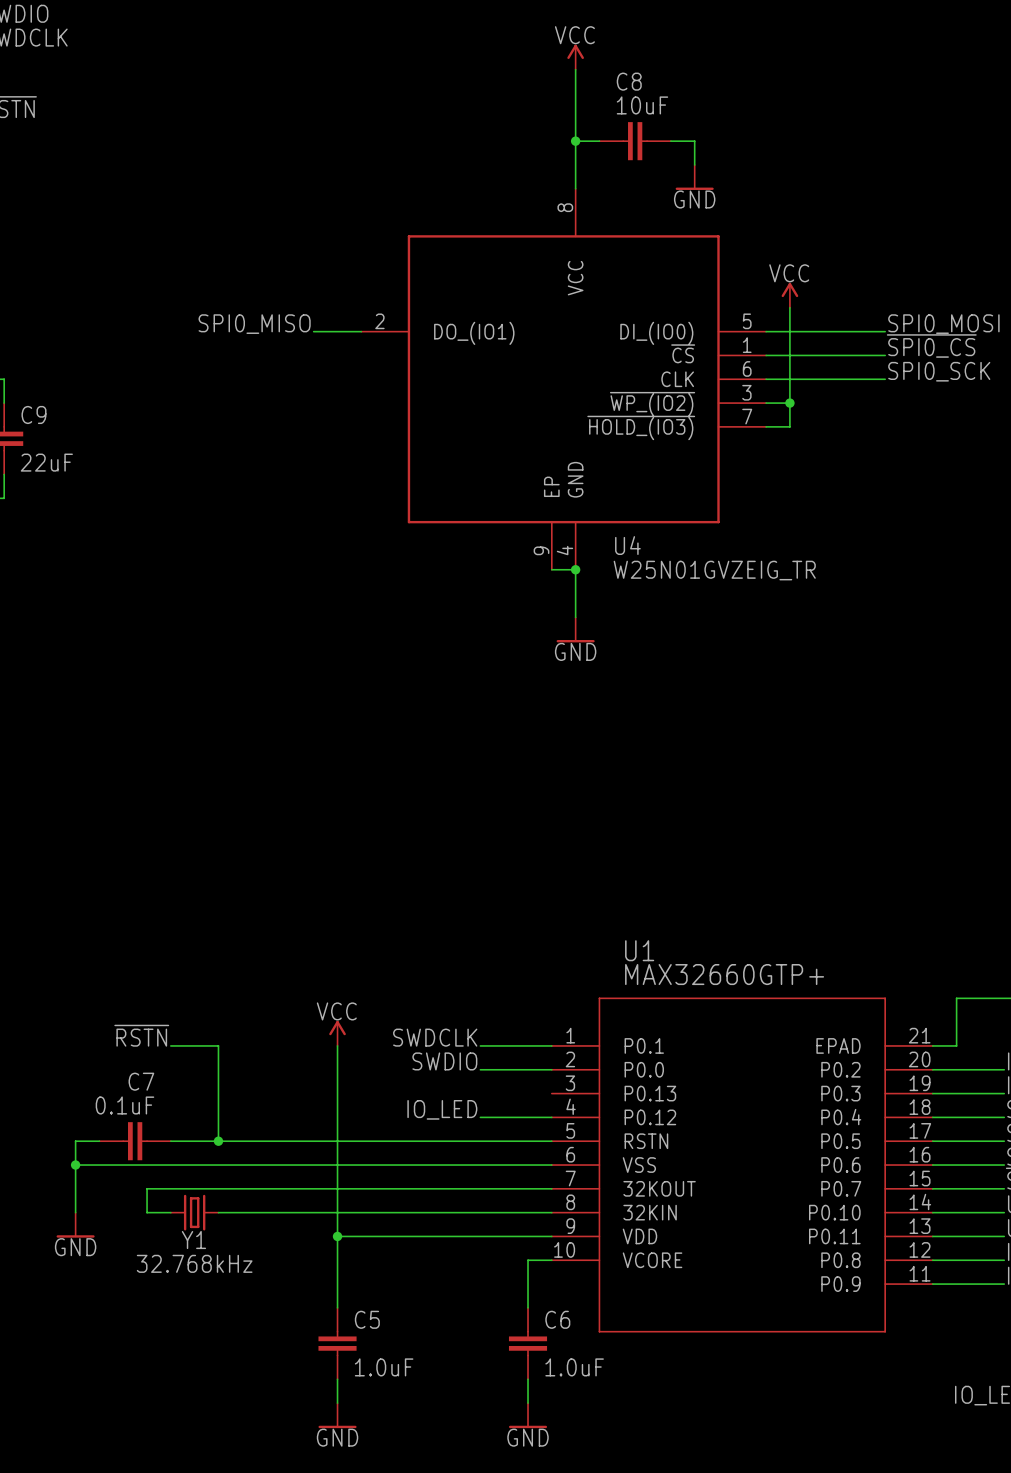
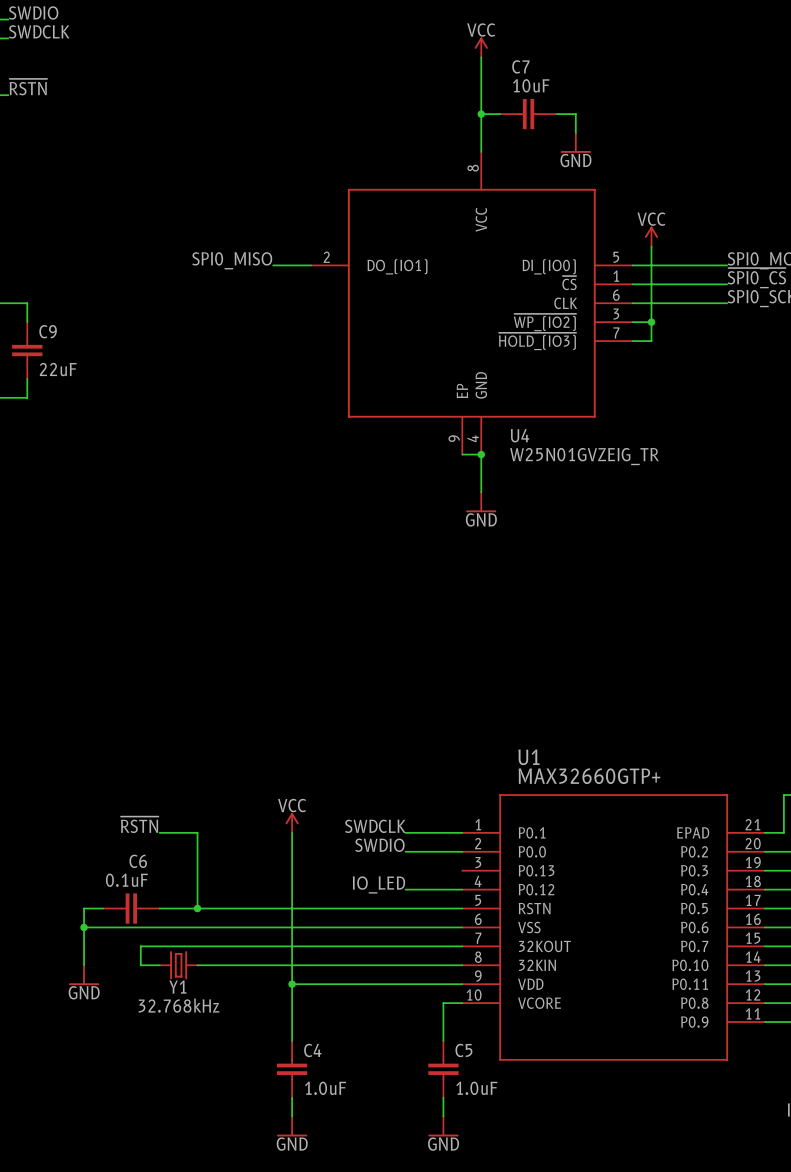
C8 name: C8 (629, 81) -> C7 (520, 66)
C7 name: C7 (141, 1081) -> C6 (138, 861)
C5 name: C5 (367, 1319) -> C4 (312, 1050)
C6 name: C6 (557, 1319) -> C5 (463, 1050)

